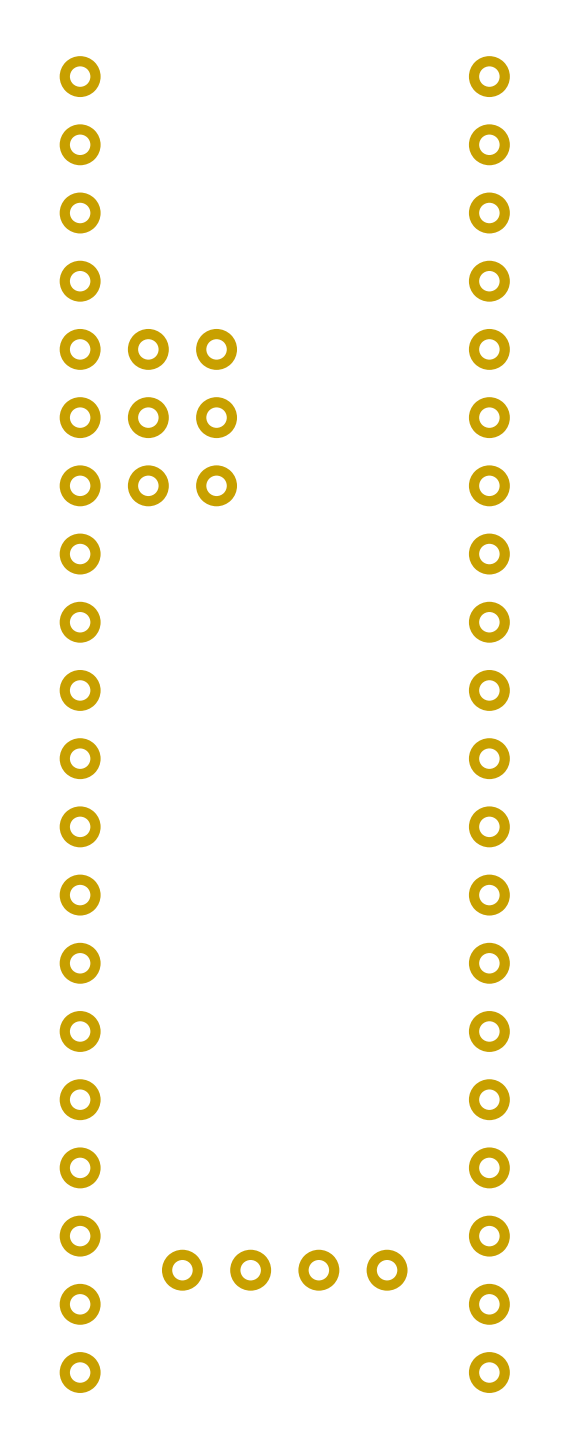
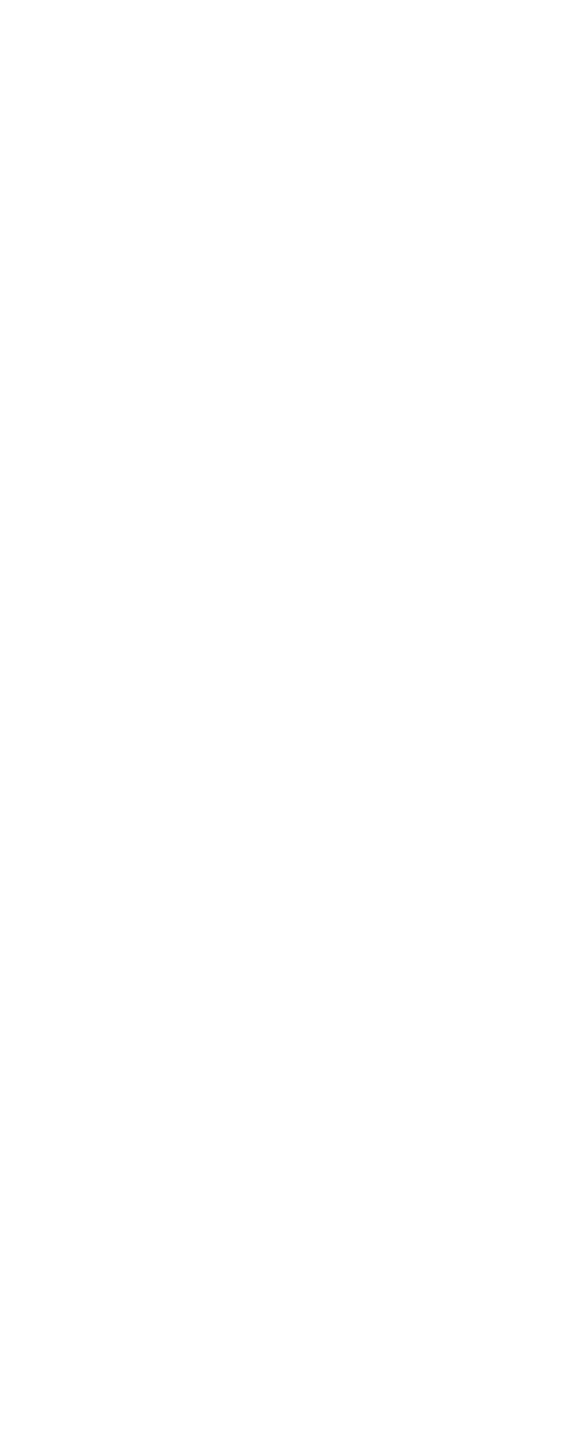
part: (284, 724) -> none

